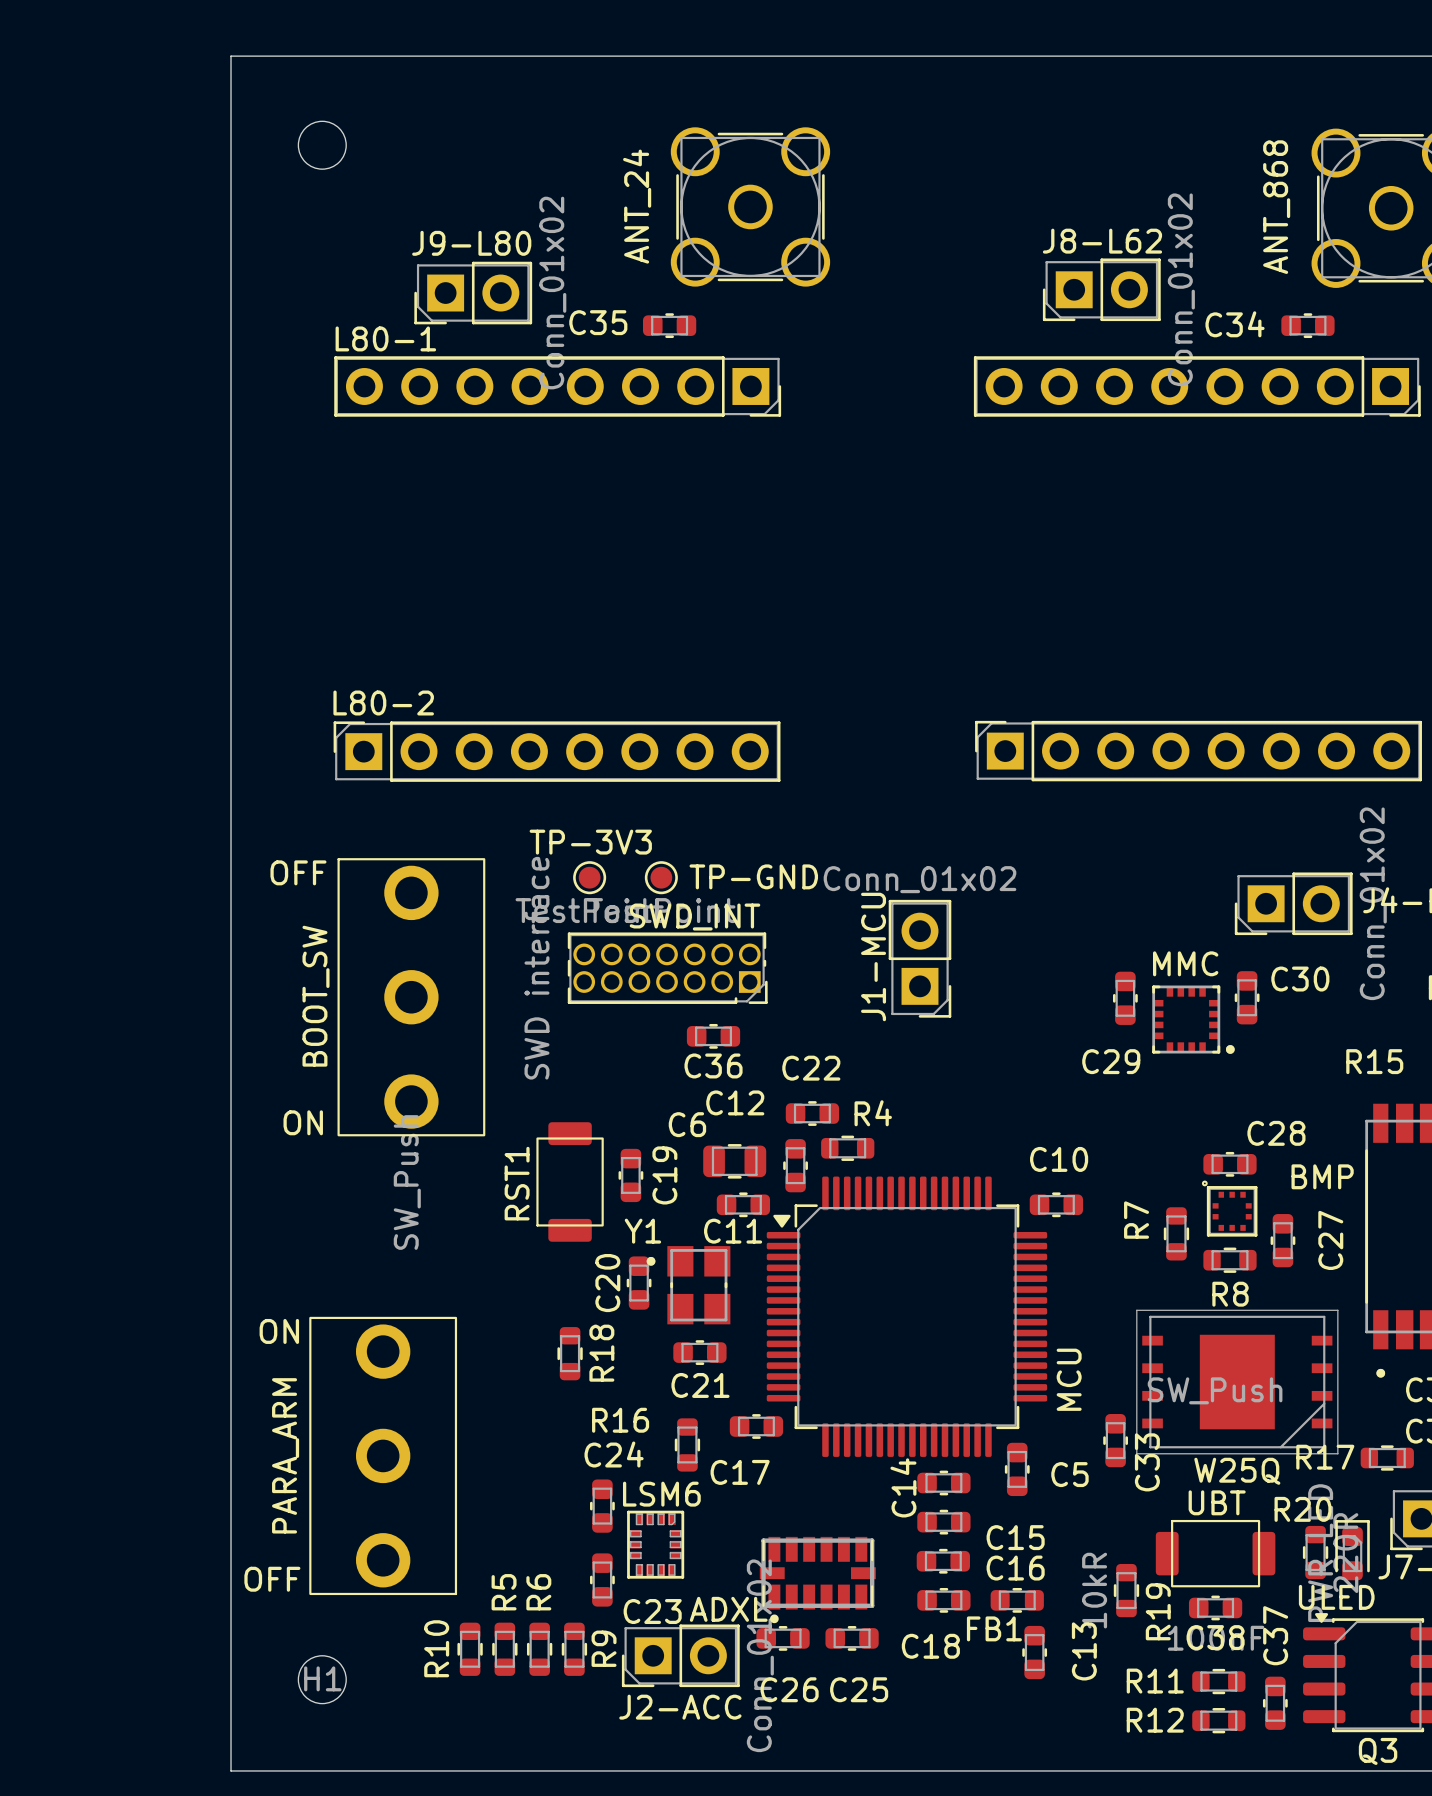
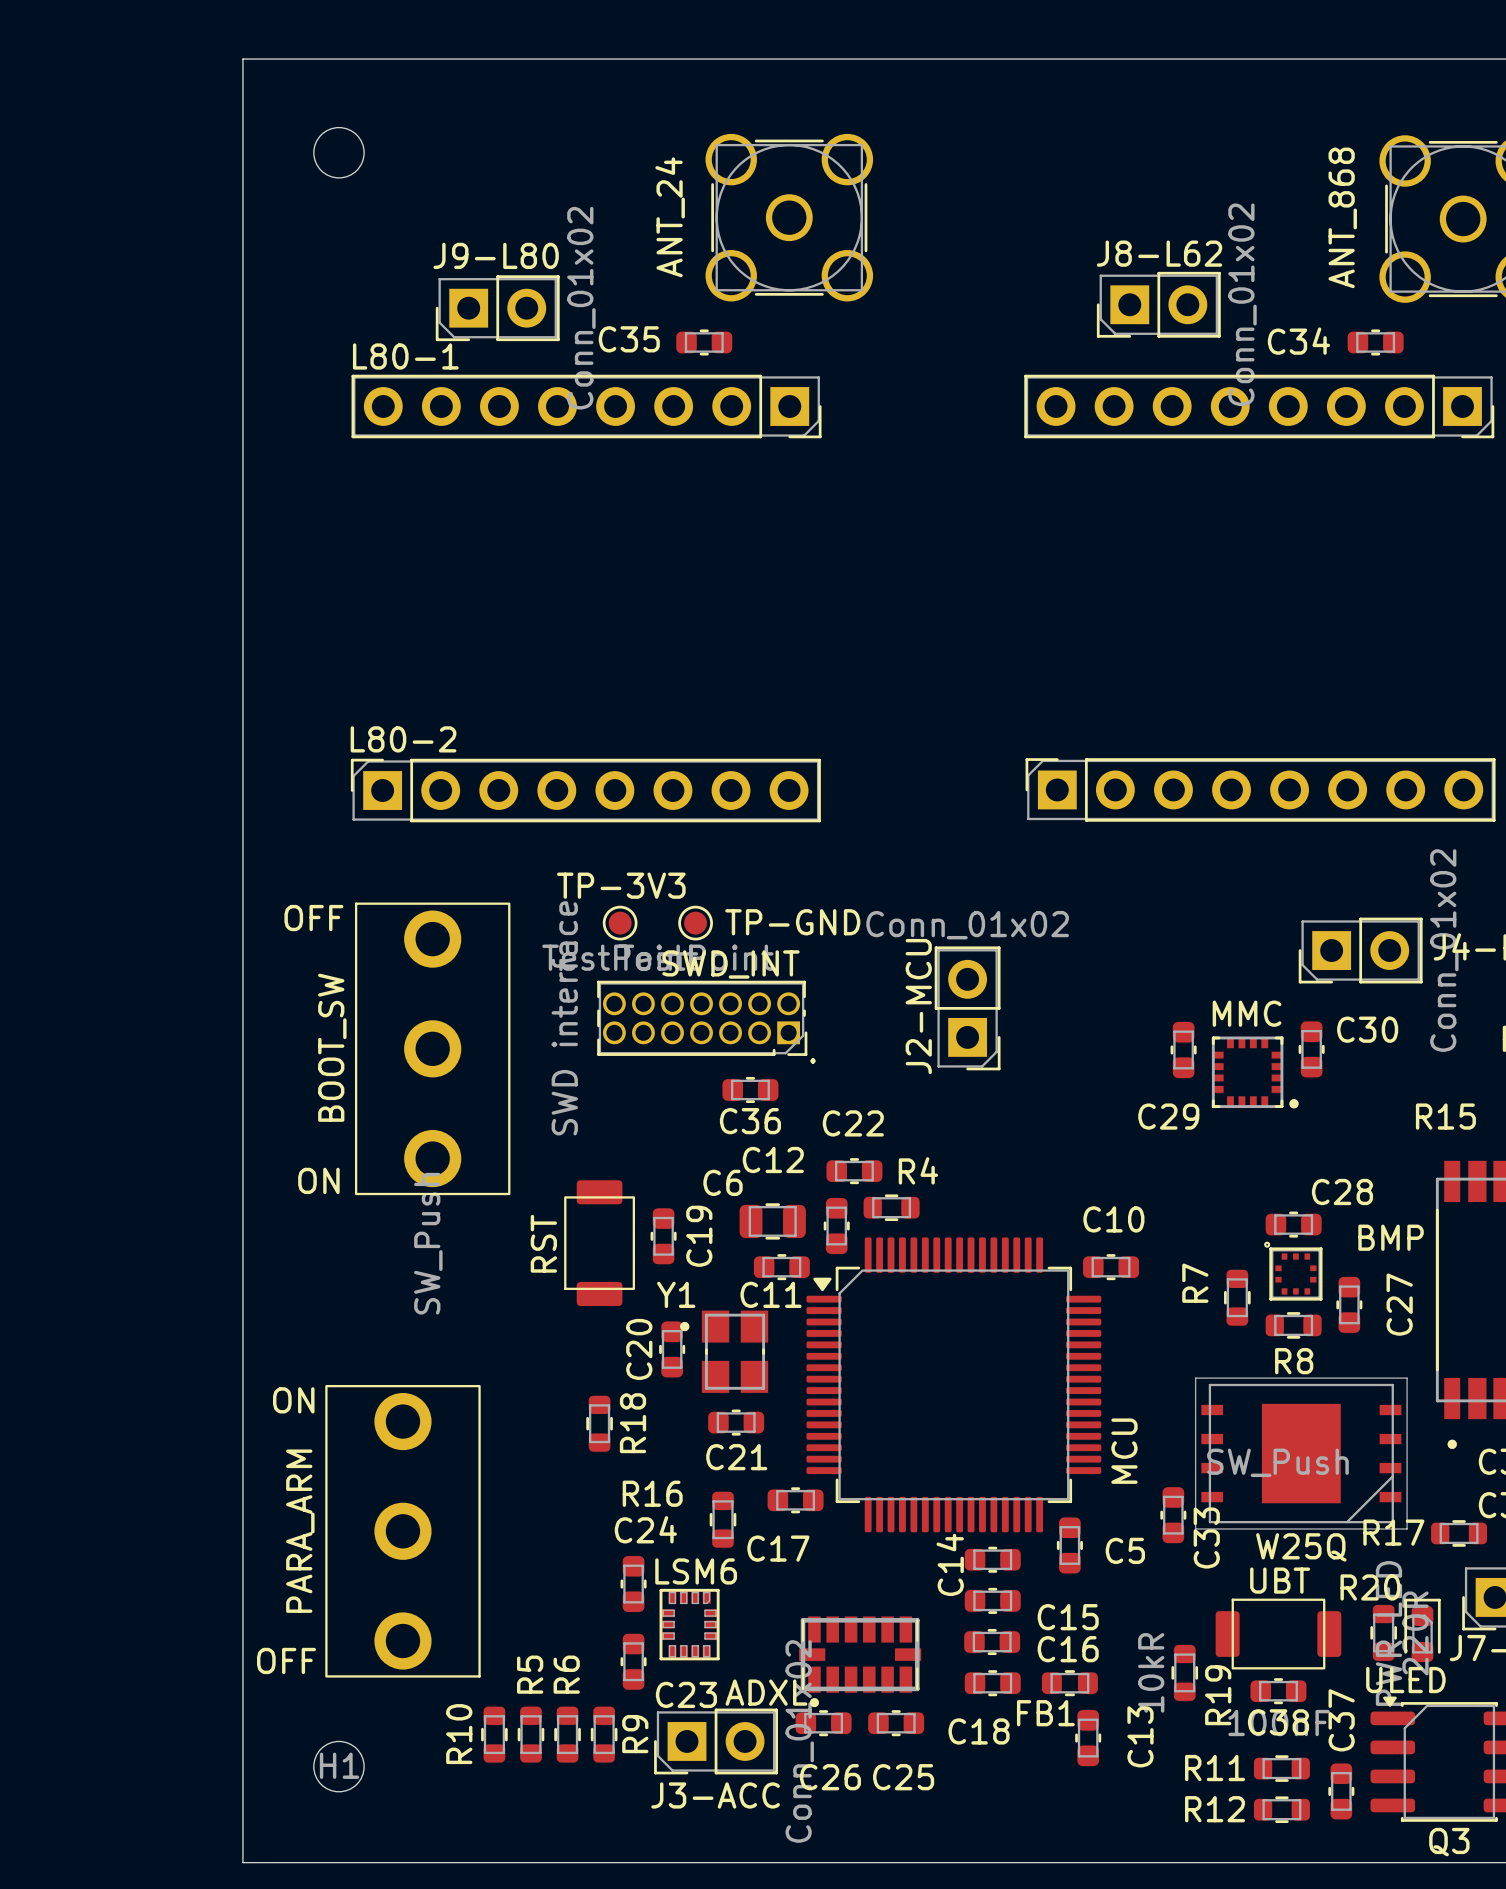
J1-MCU name: J1-MCU (873, 956) -> J2-MCU (918, 1006)
text: none -> . (813, 1060)
RST1 name: RST1 (517, 1183) -> RST (543, 1243)
J2-ACC name: J2-ACC (680, 1707) -> J3-ACC (715, 1795)

